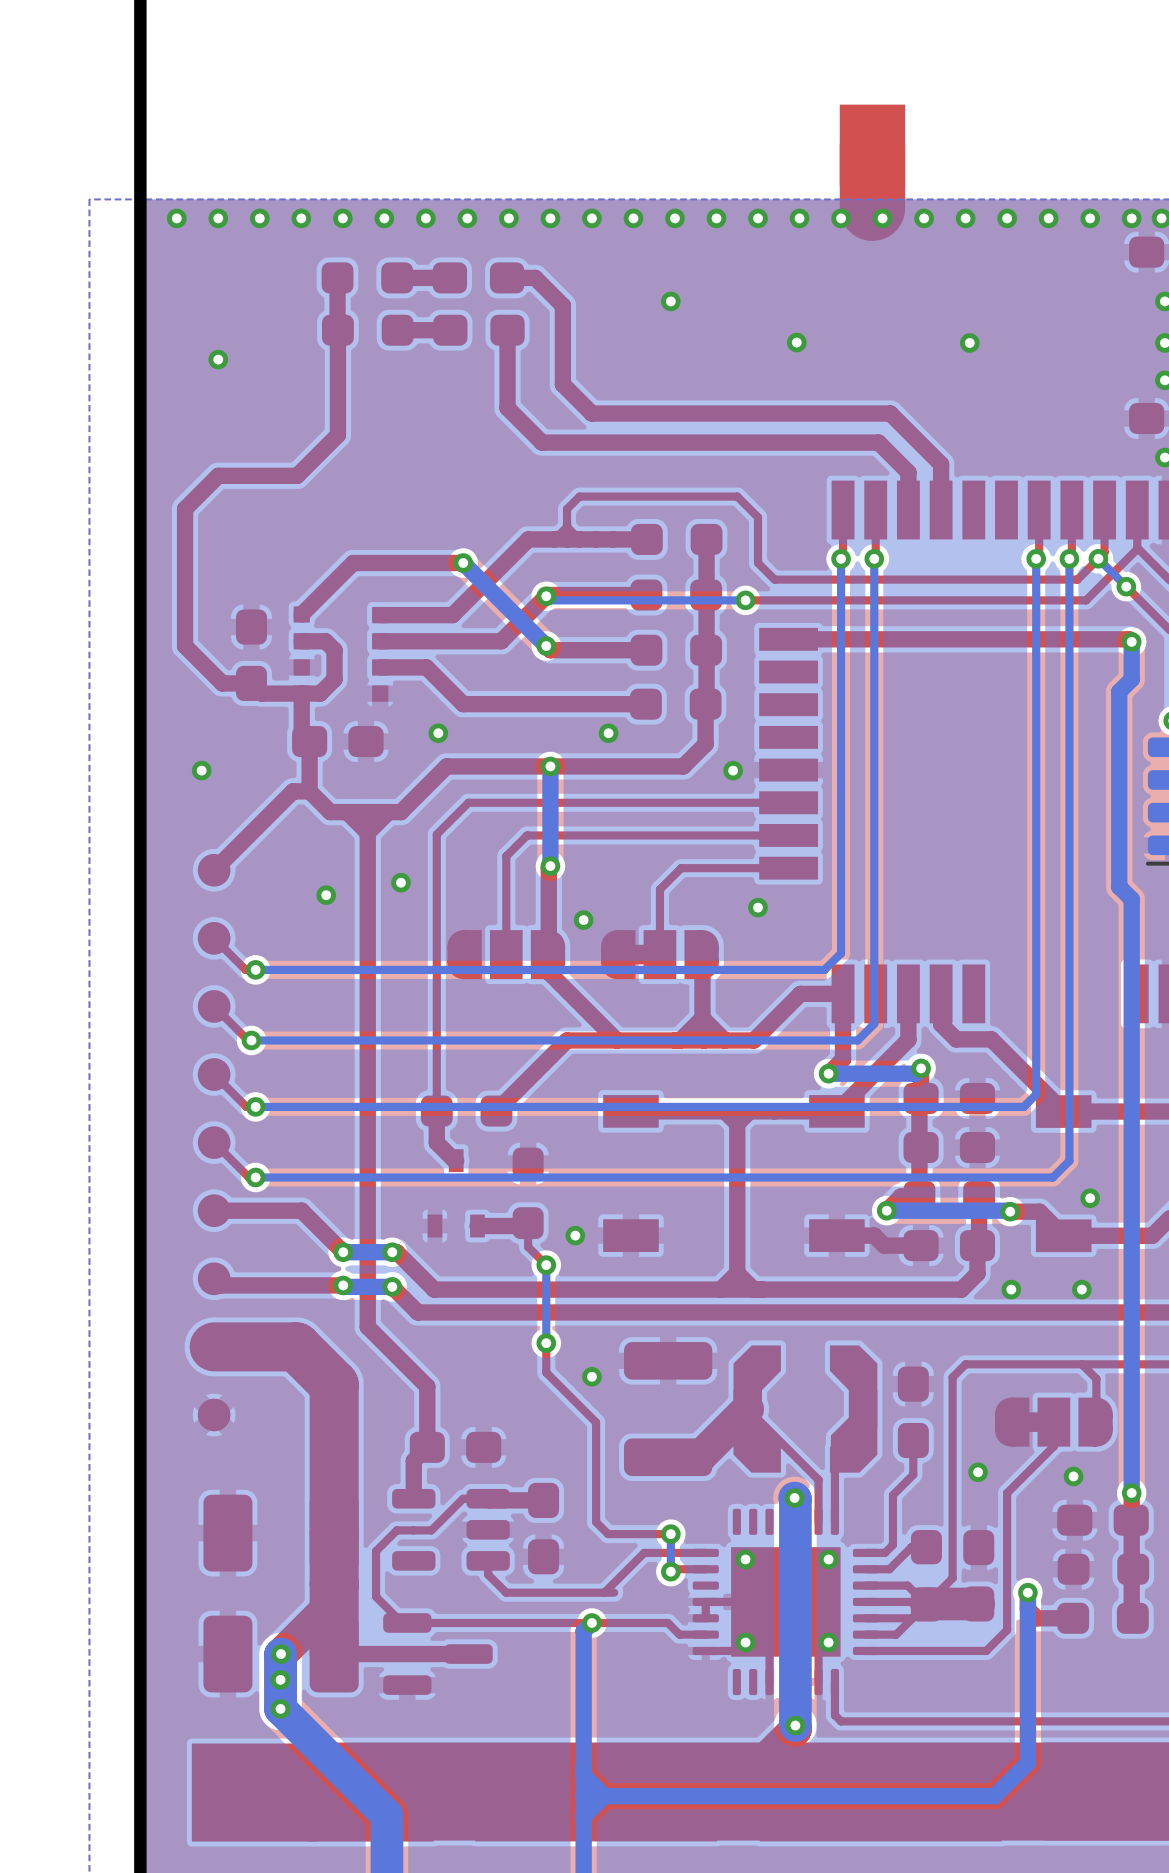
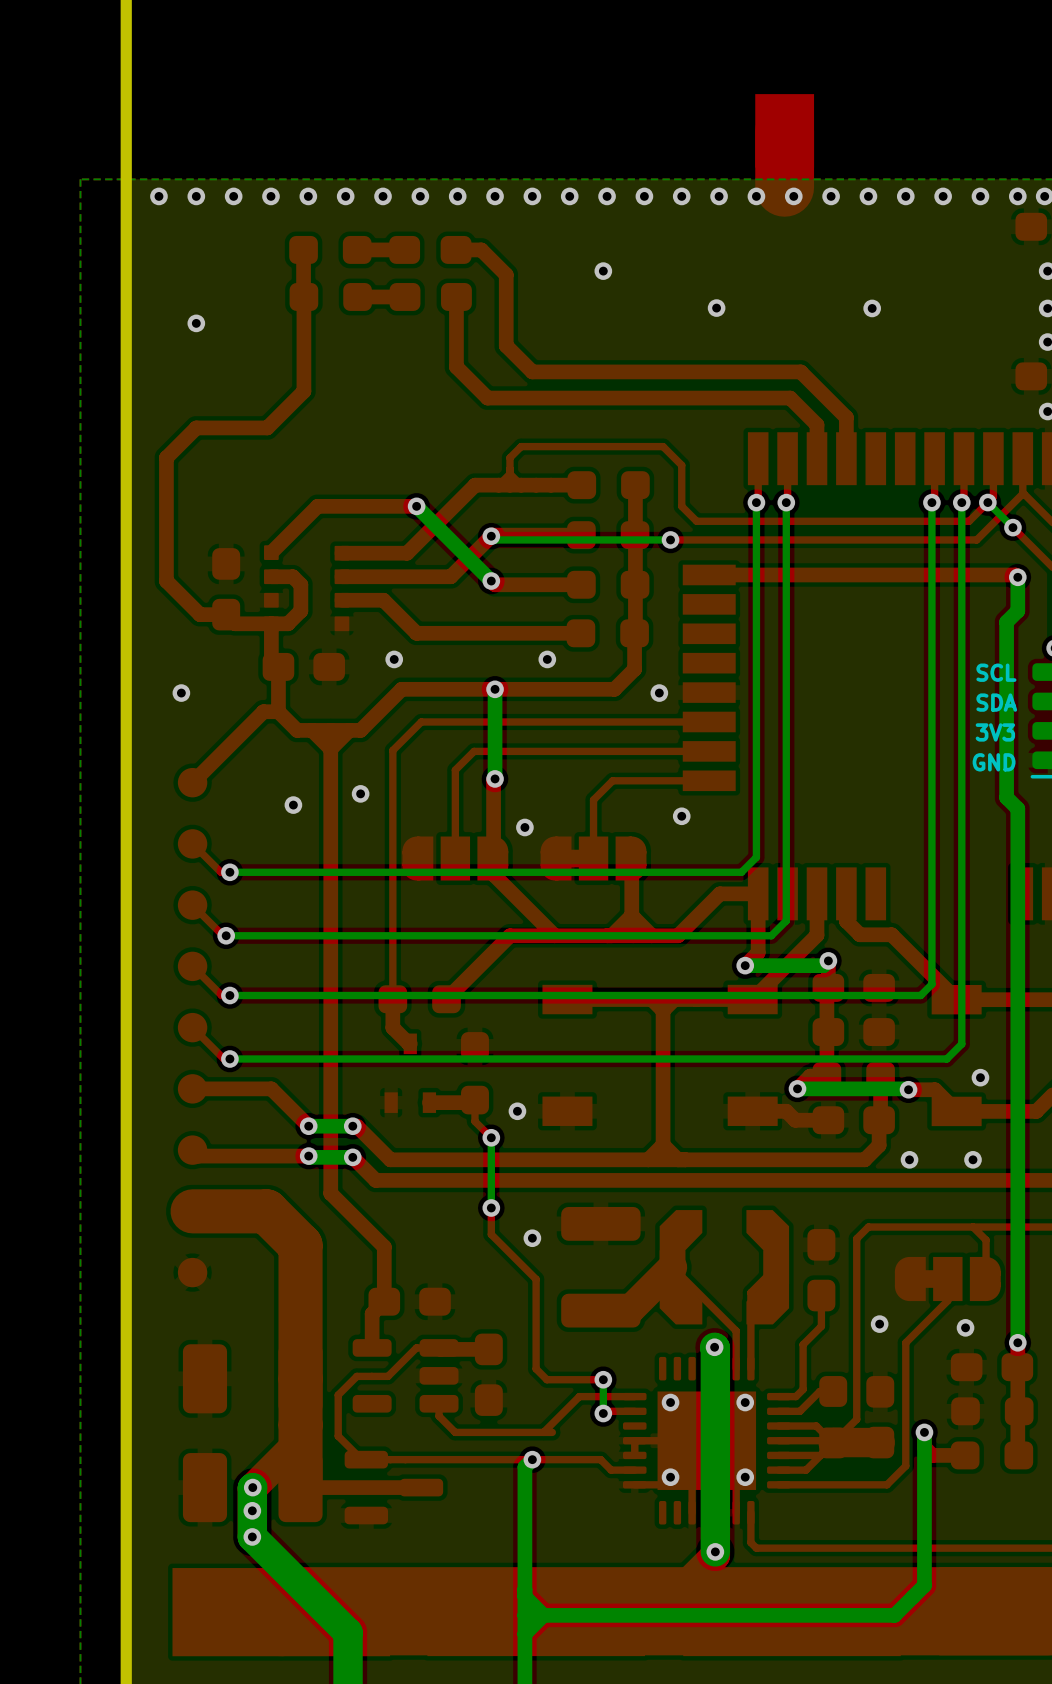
text: none -> SCL (996, 672)
text: none -> SDA (996, 702)
text: none -> 3V3 (995, 732)
text: none -> GND (994, 762)

